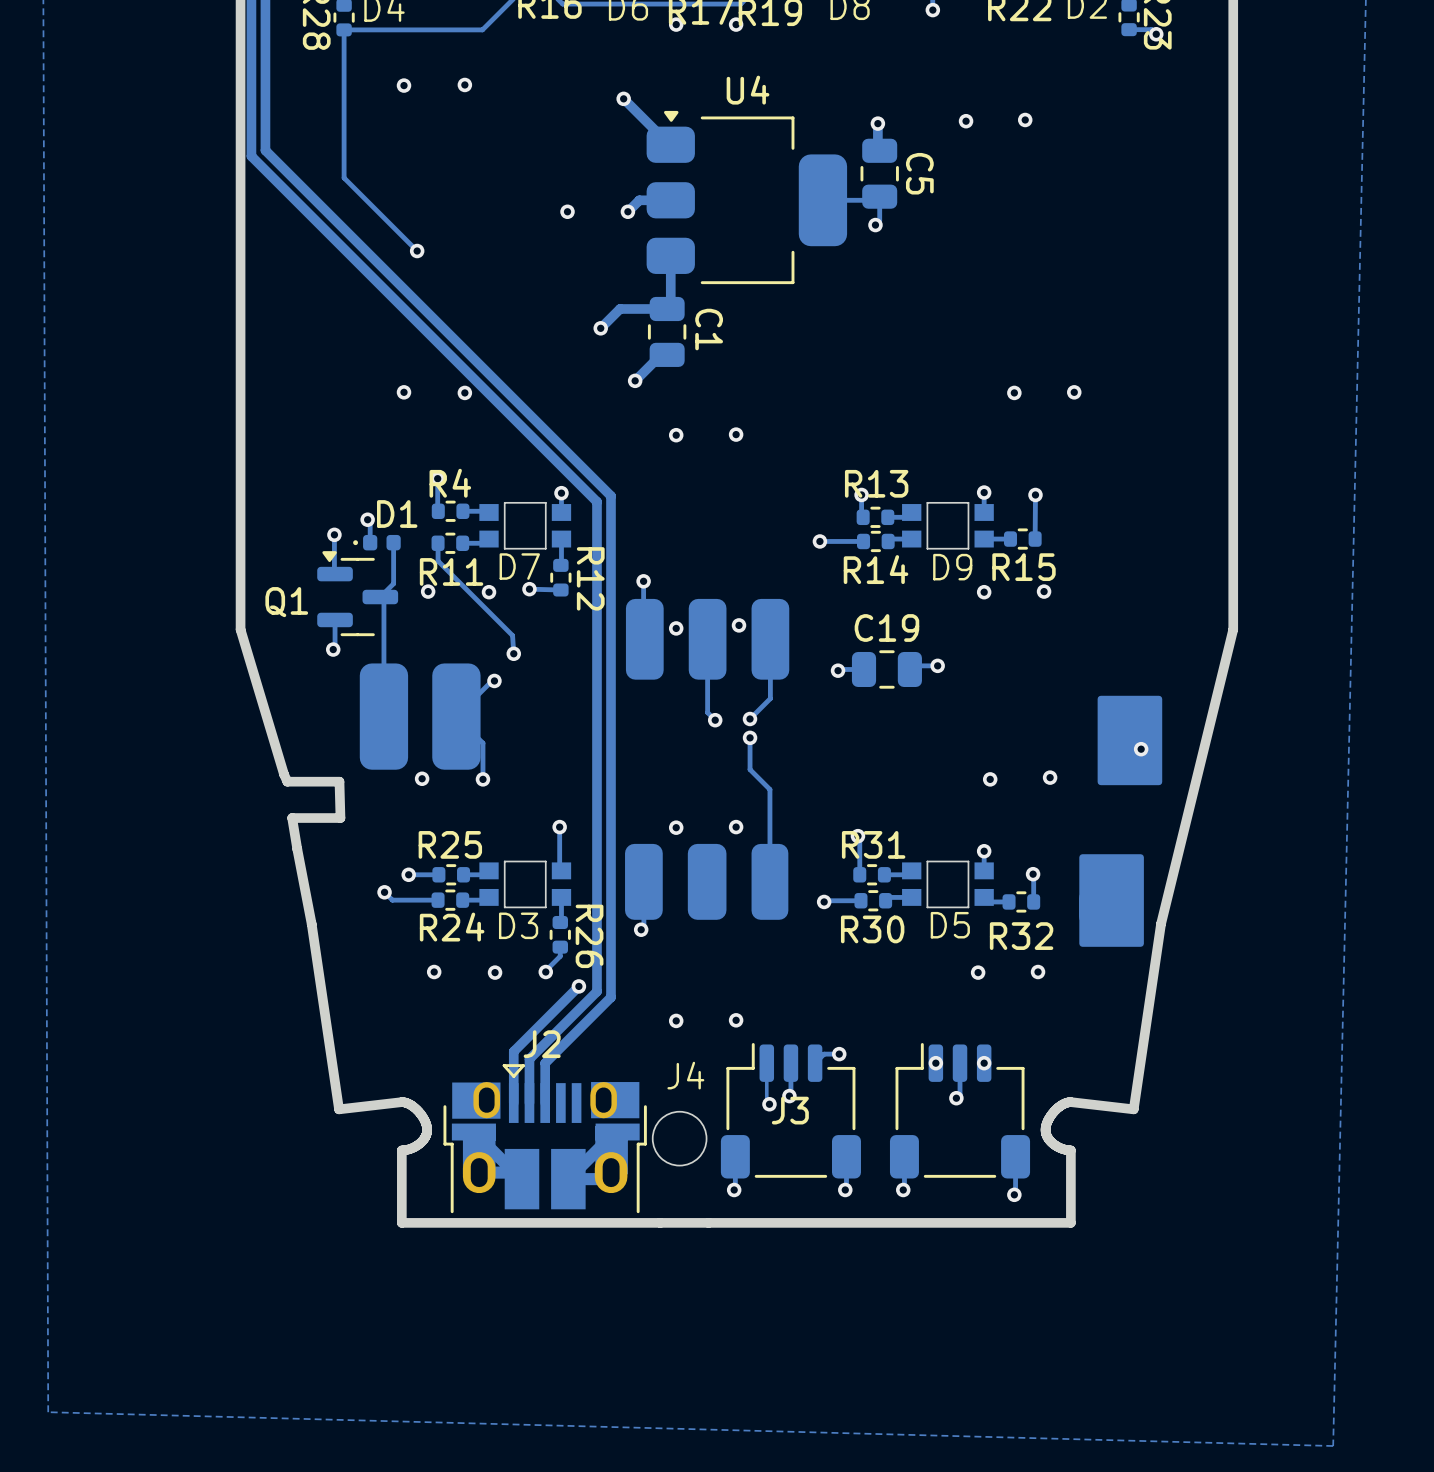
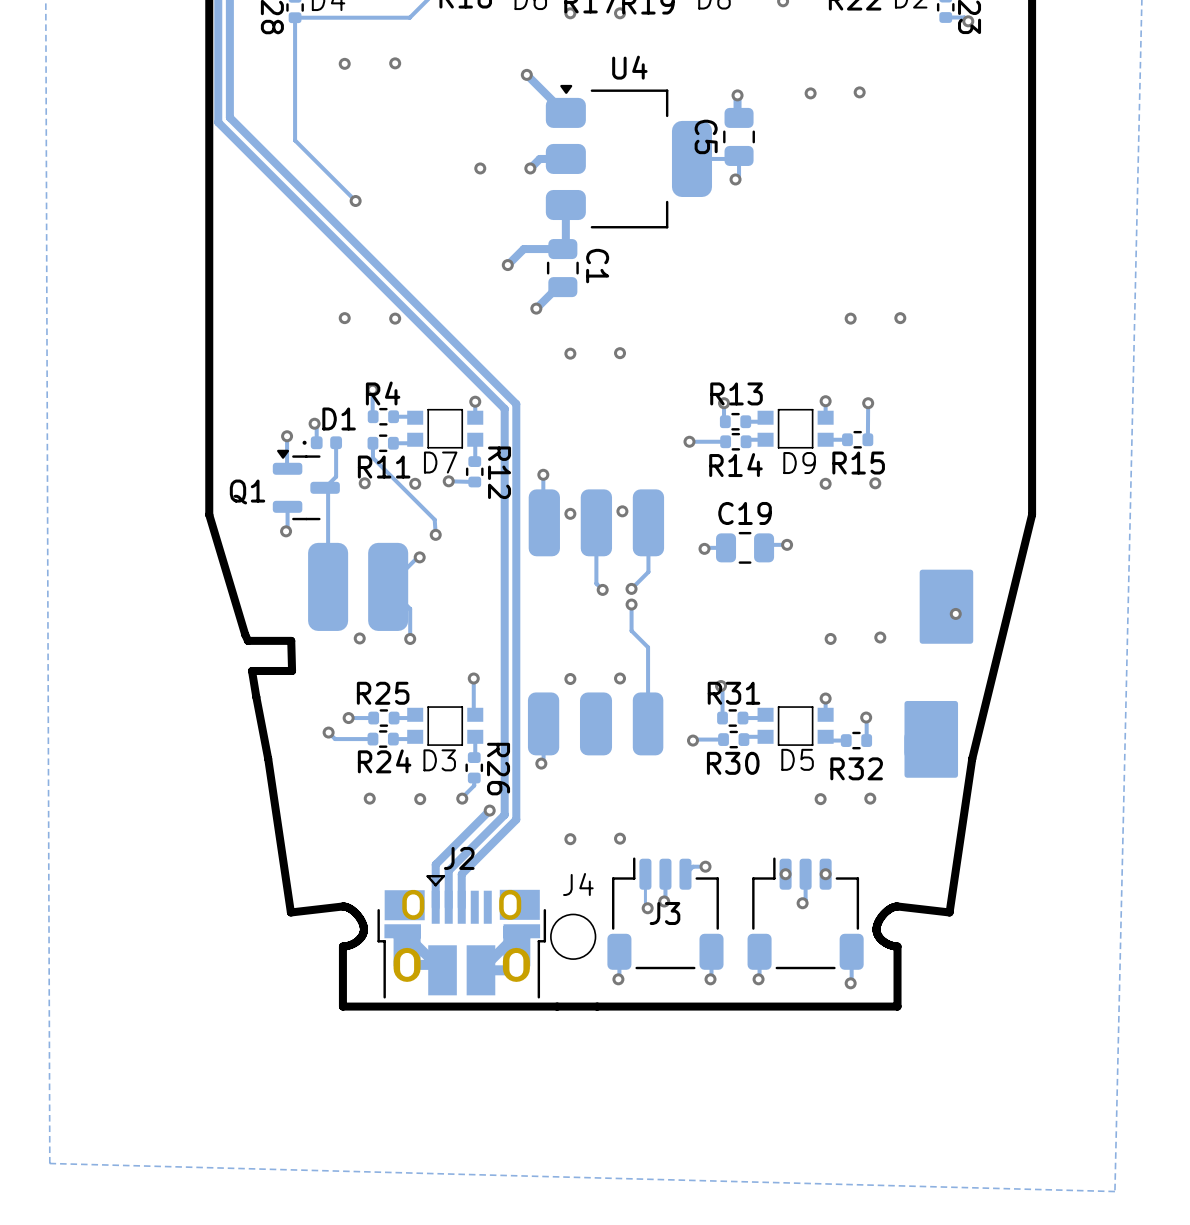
C5 name position: C5 (919, 173) -> C5 (706, 136)

